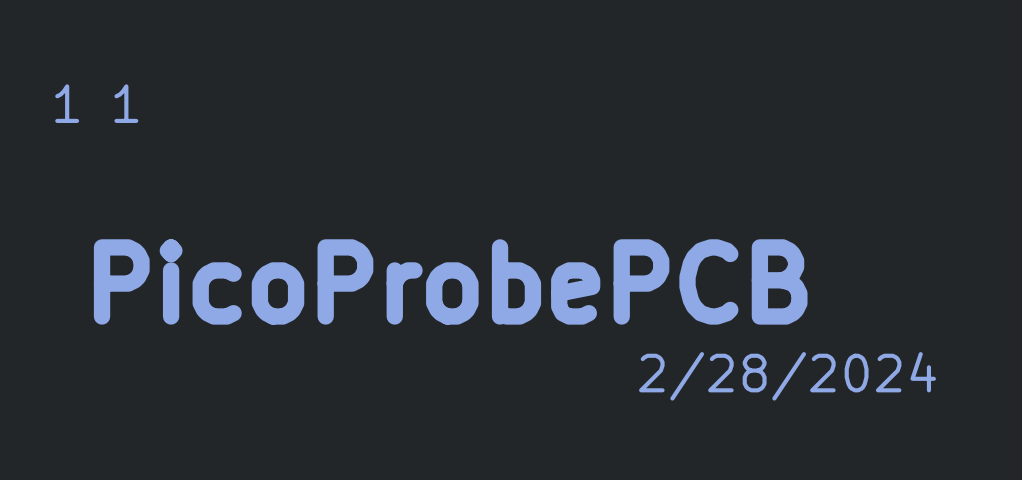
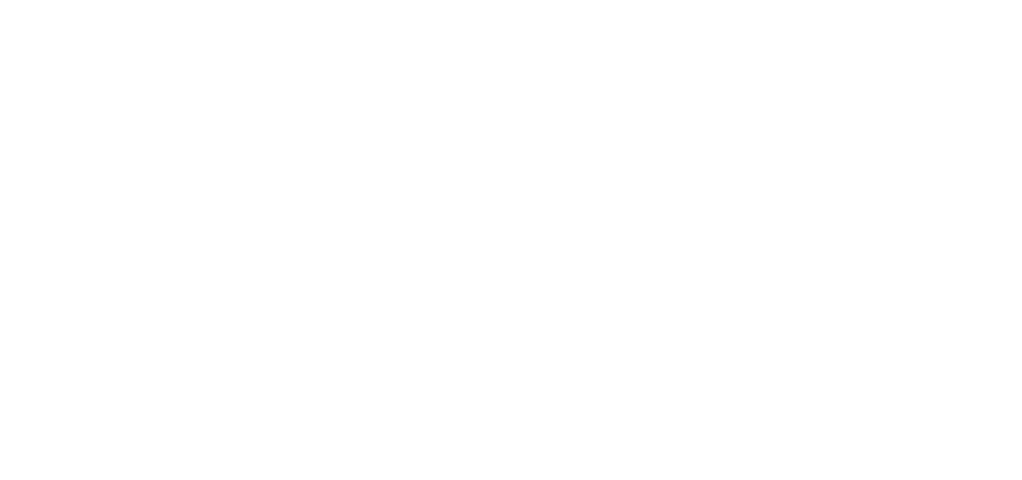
text: 1 1 (96, 103) -> none
text: PicoProbePCB (450, 281) -> none
text: 2/28/2024 (787, 376) -> none

